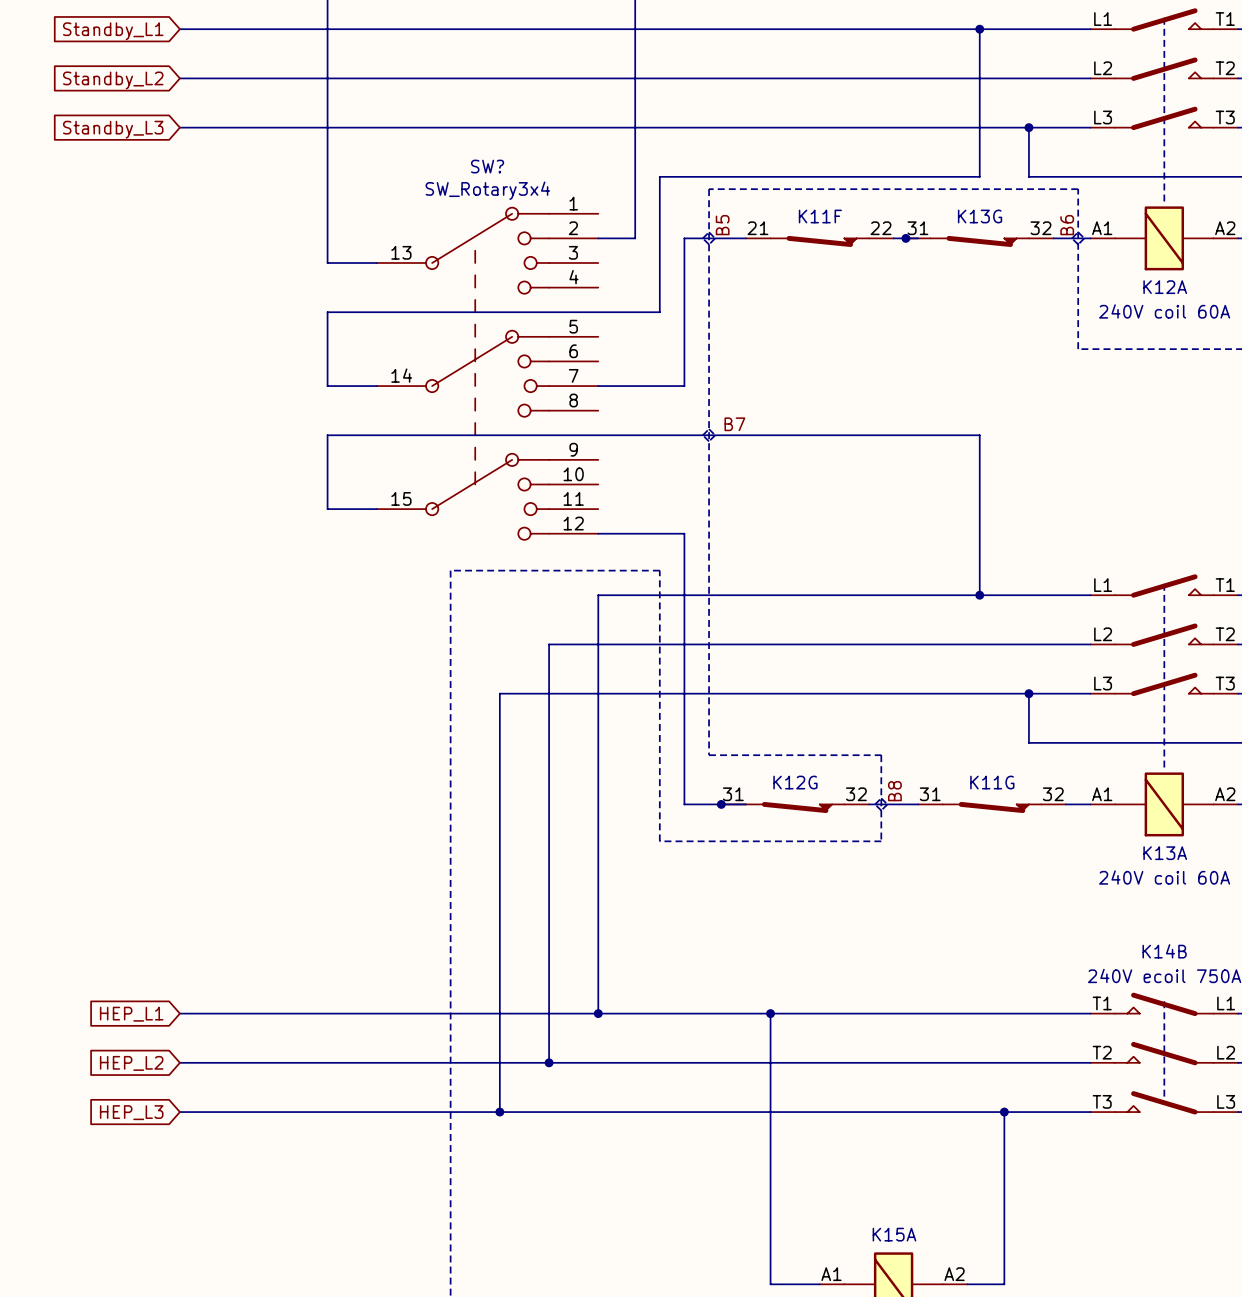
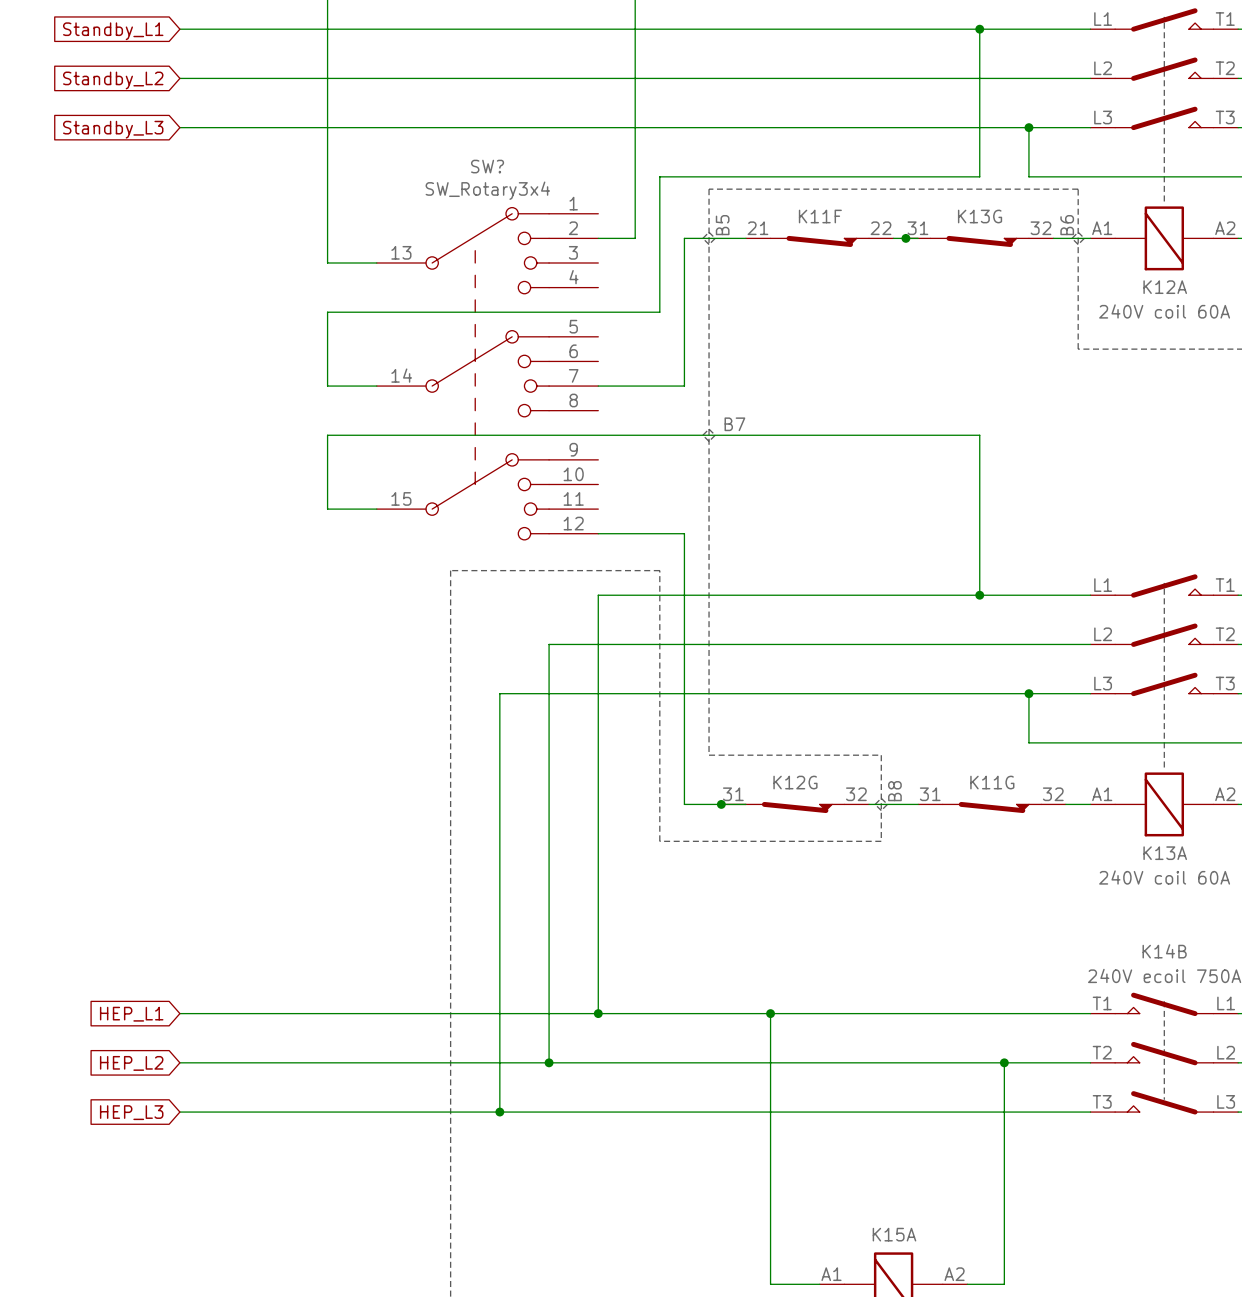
wire: none -> (1004, 1062) (1004, 1112)
junction position: (1004, 1112) -> (1004, 1062)

